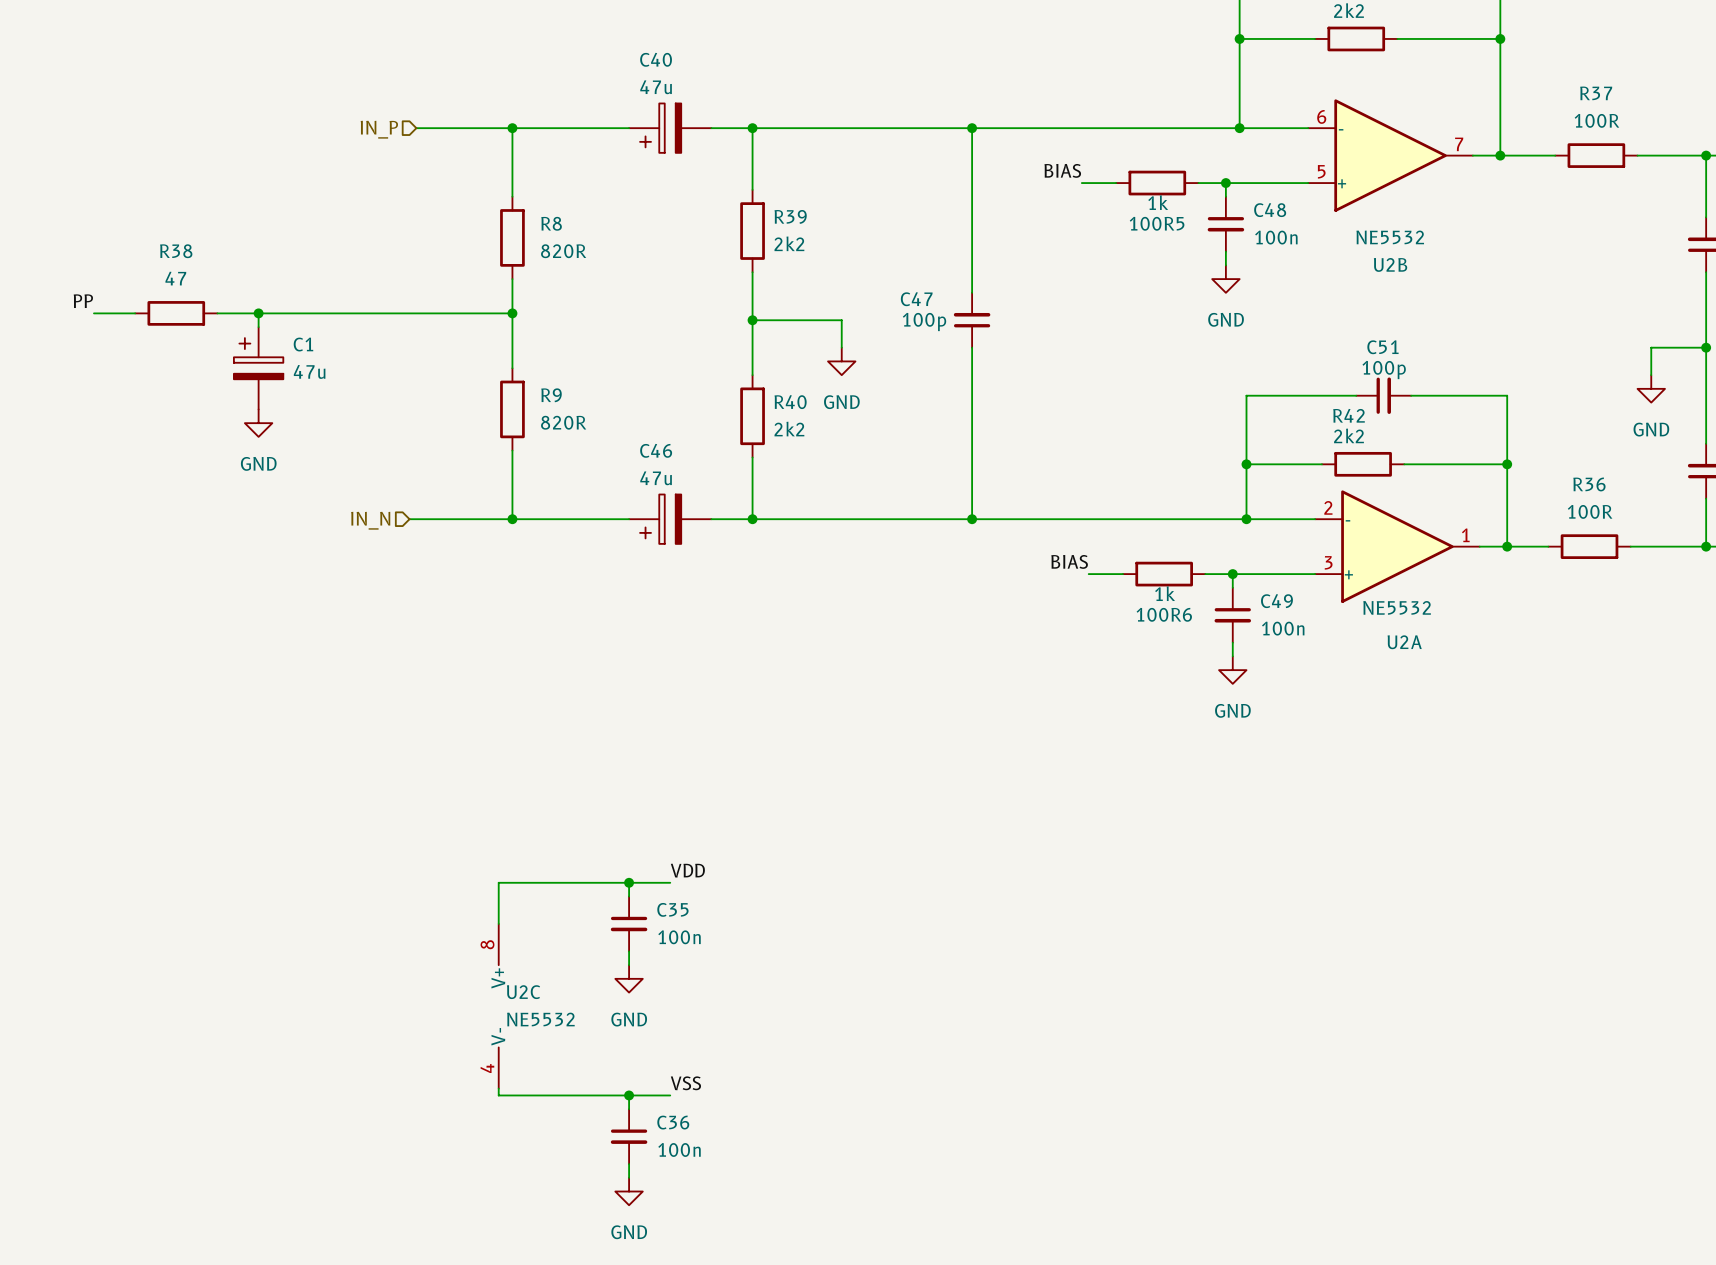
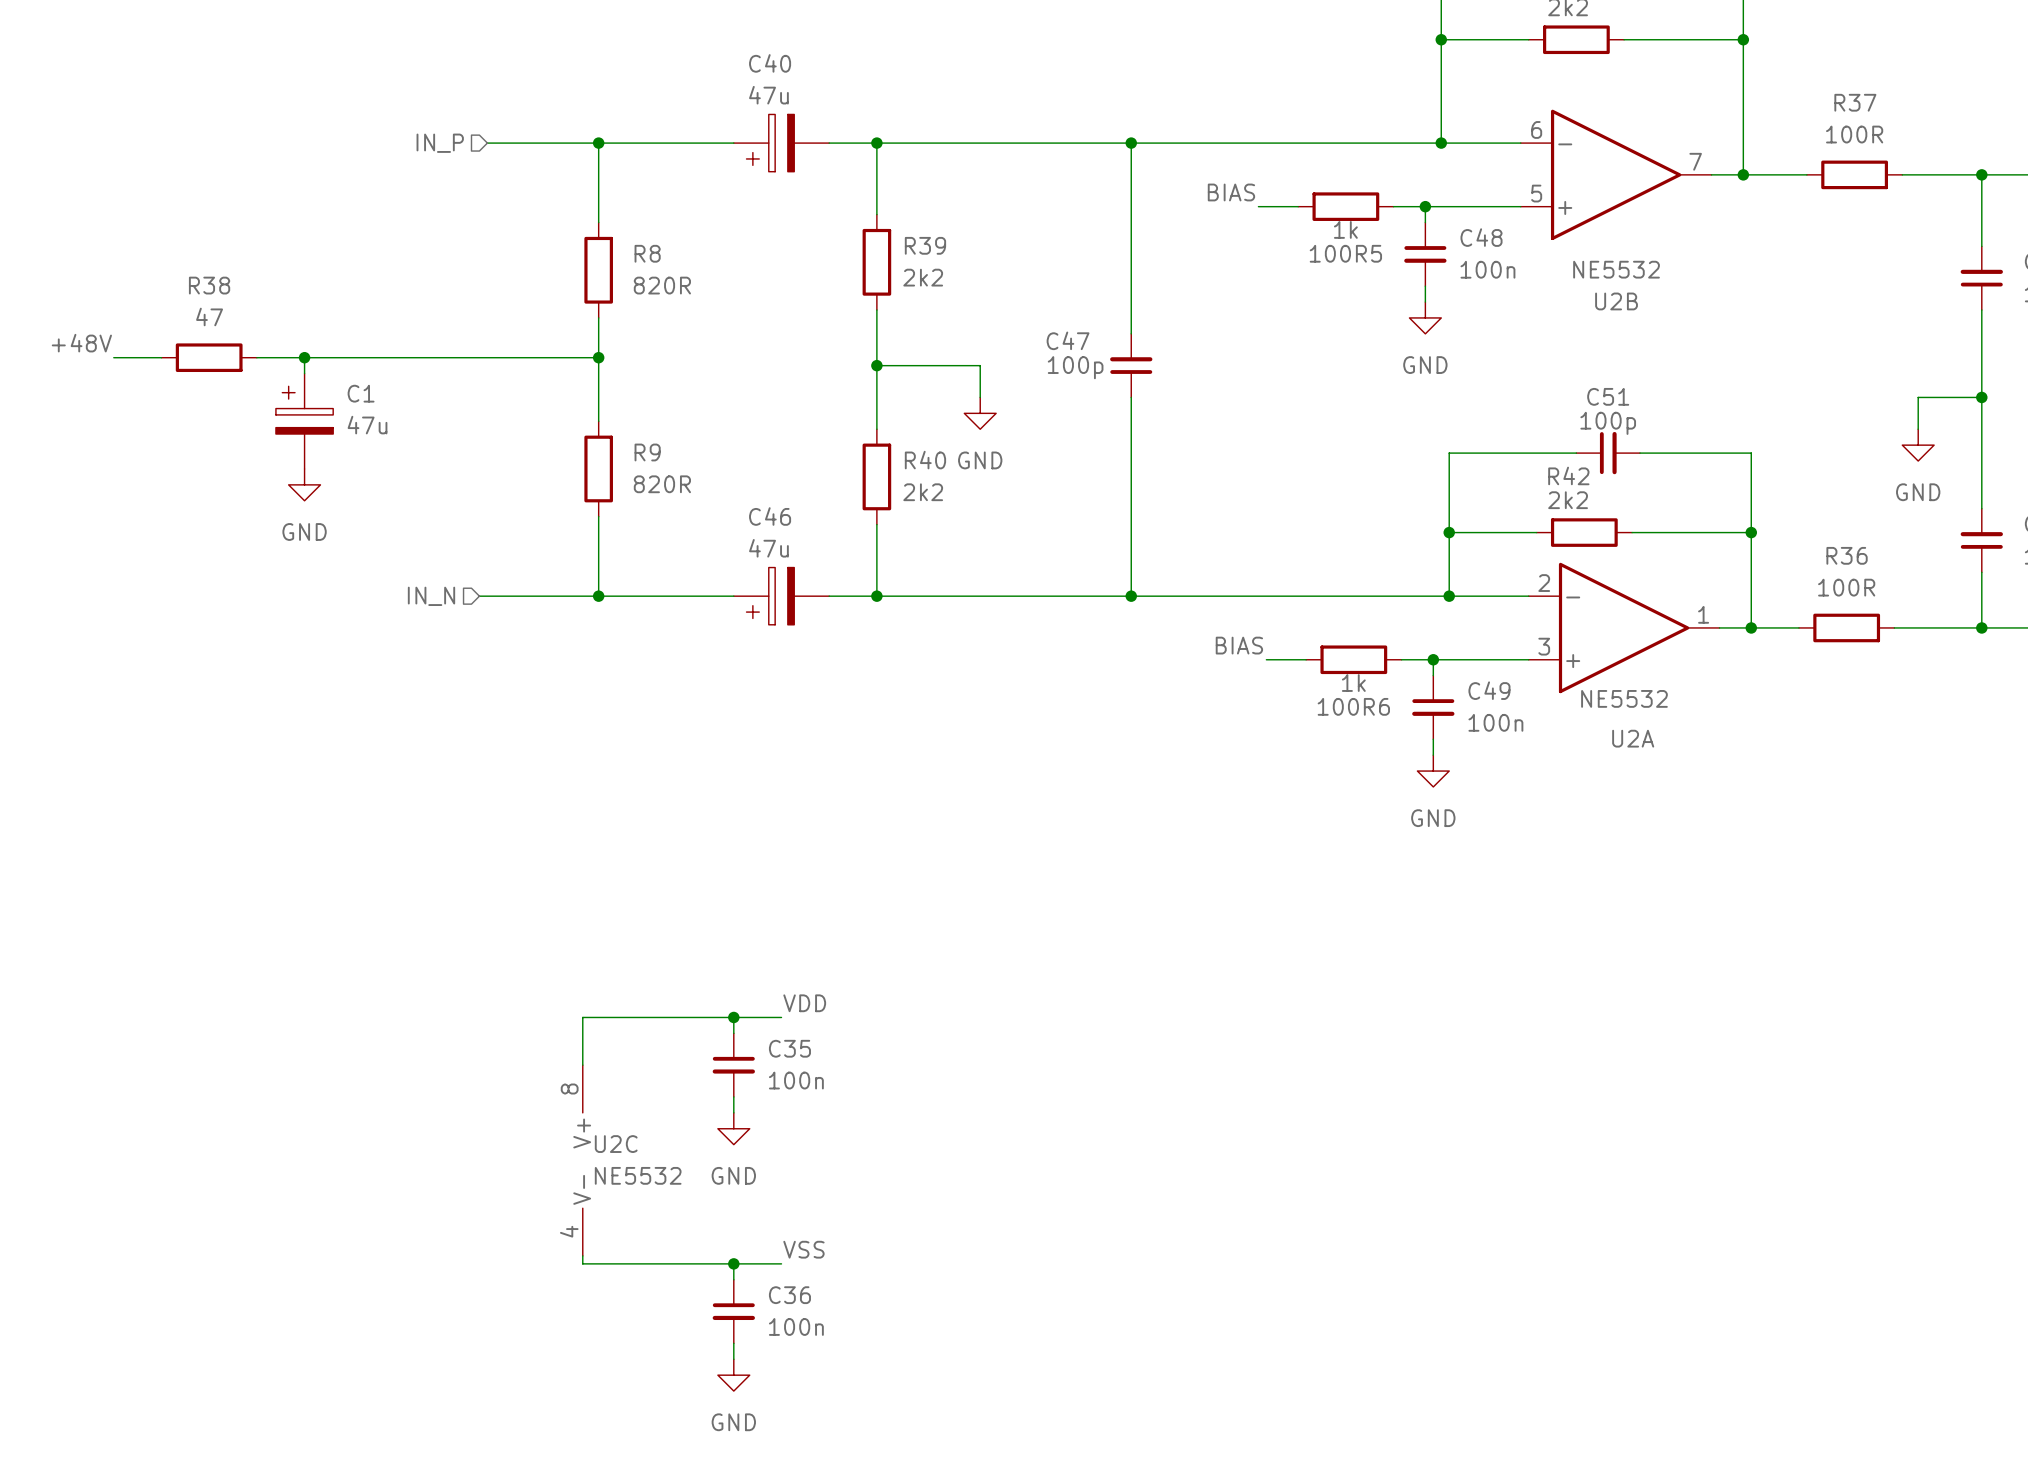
label: PP (83, 301) -> +48V (81, 343)

